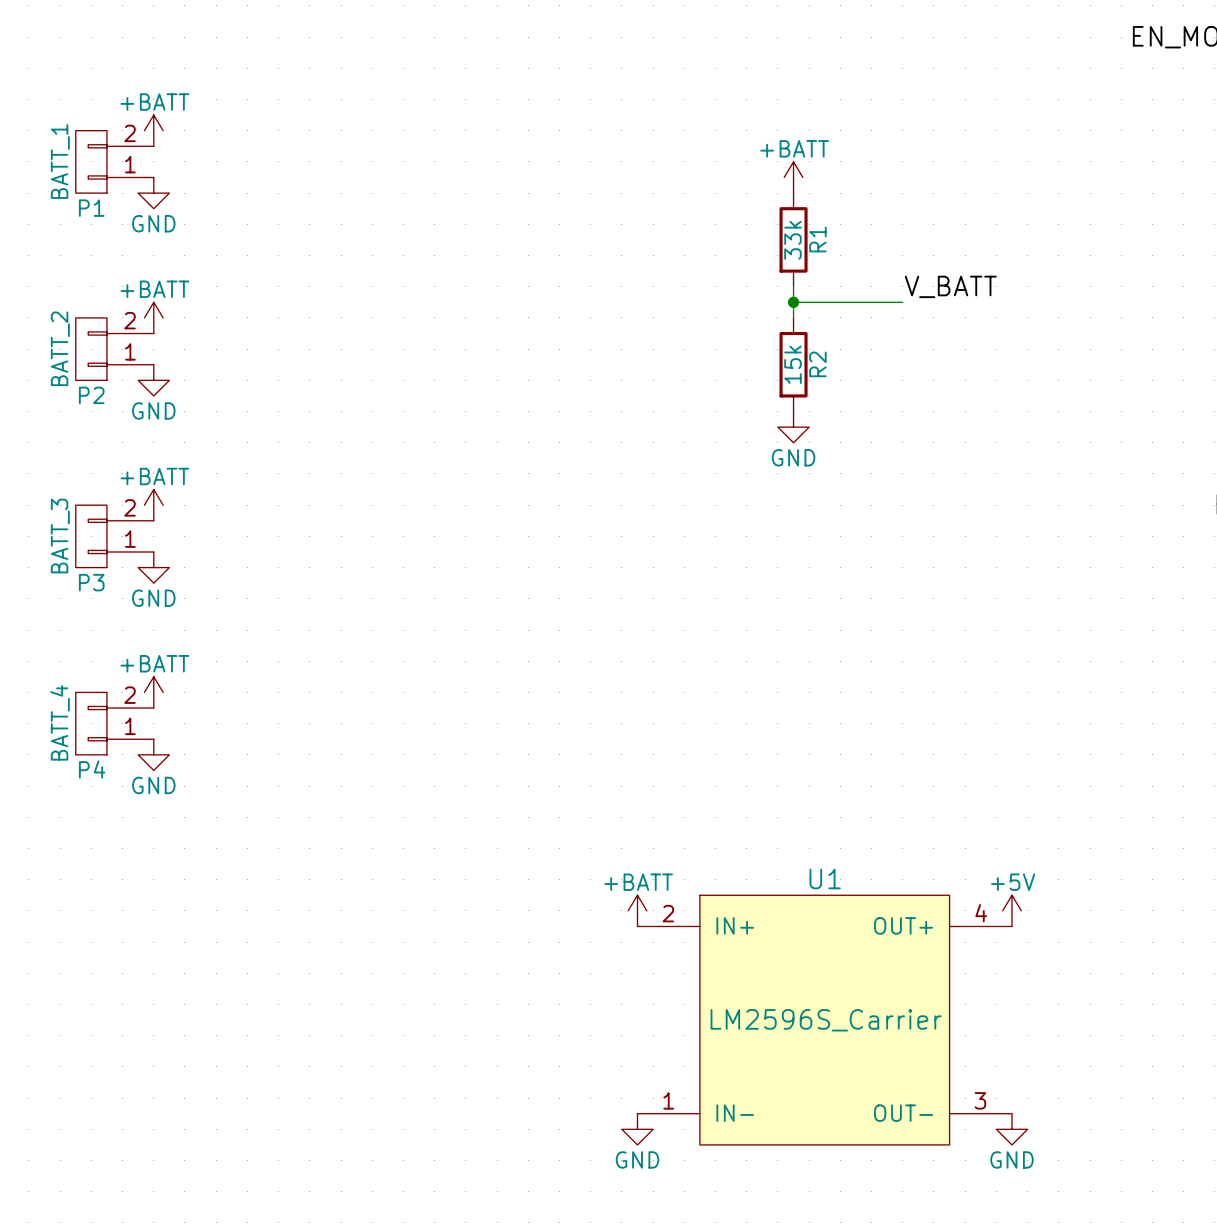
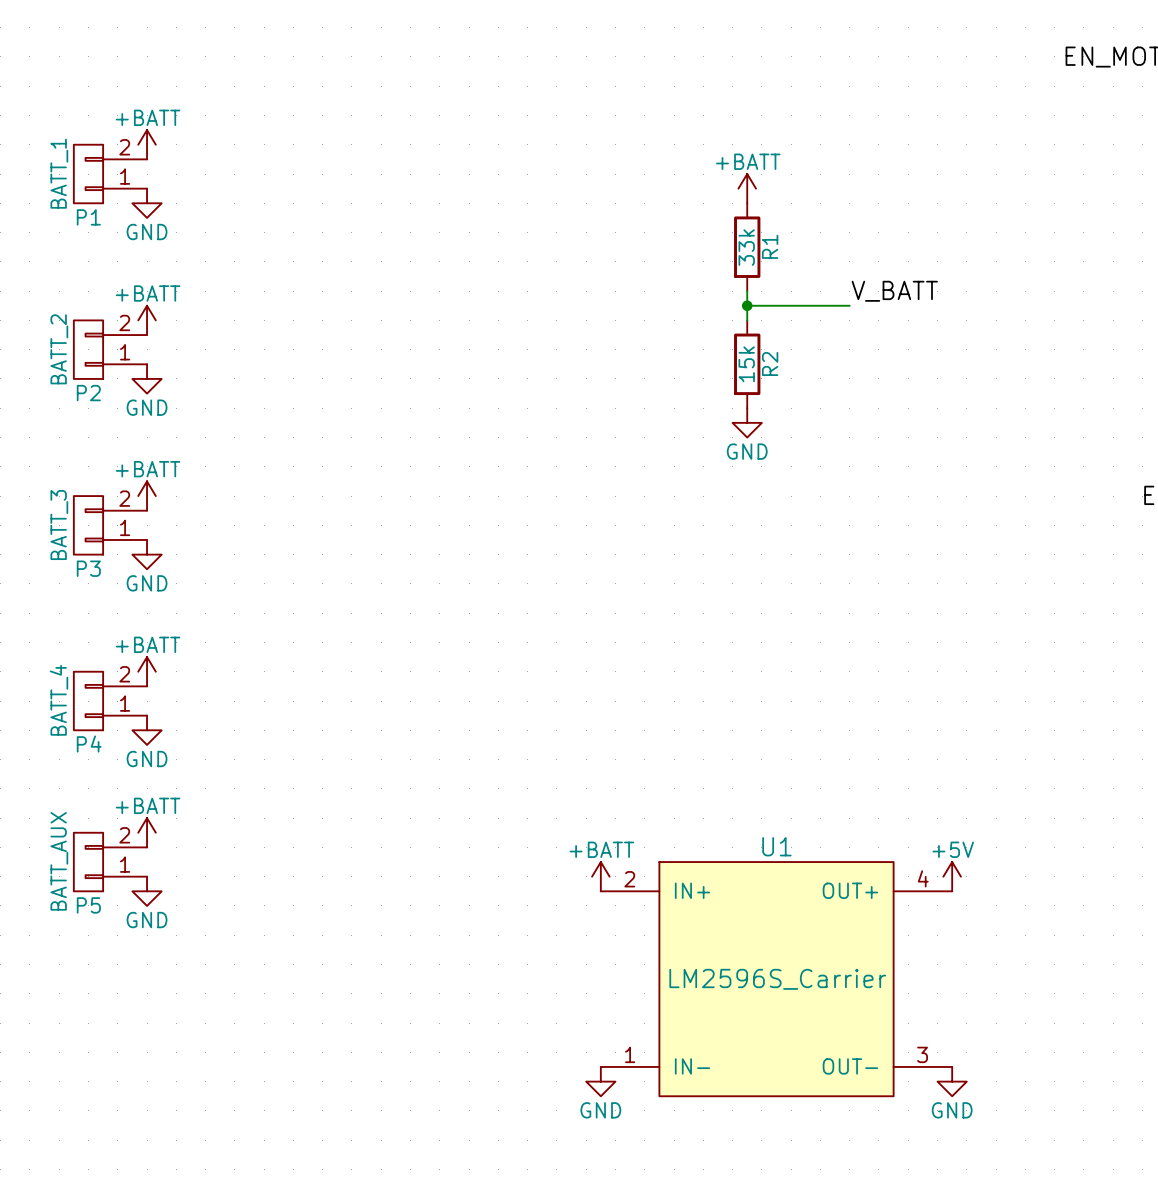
power symbol: none -> +BATT (147, 832)
P5: none -> BATT_AUX (110, 862)
power symbol: none -> GND (147, 891)

